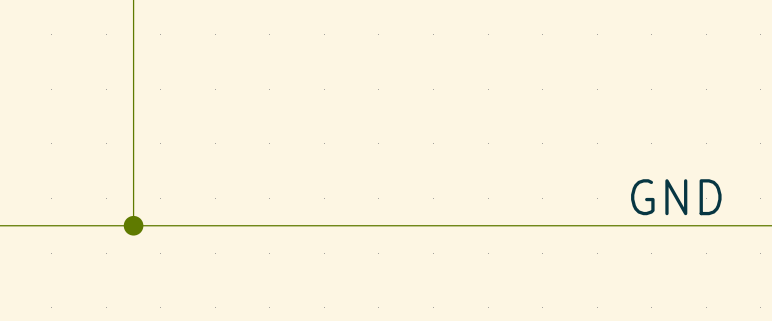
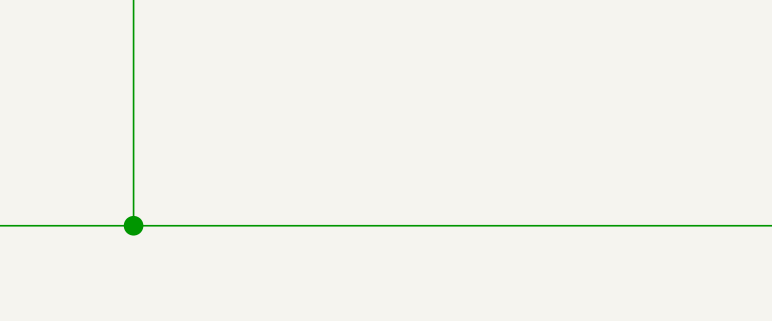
label: GND (676, 197) -> none

